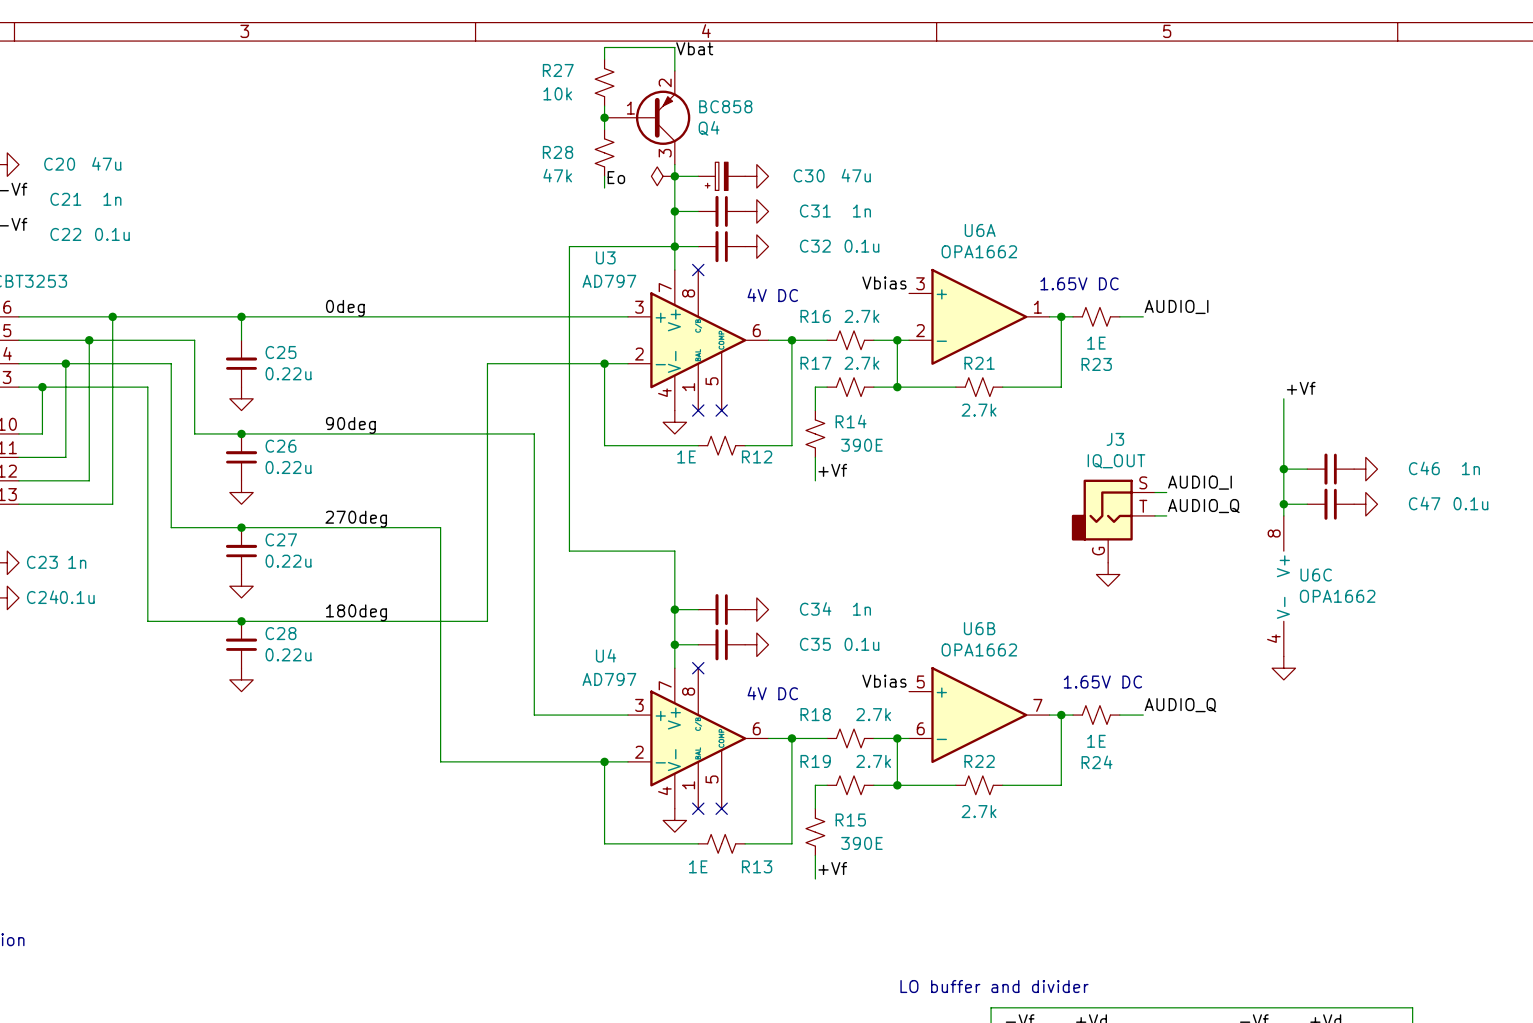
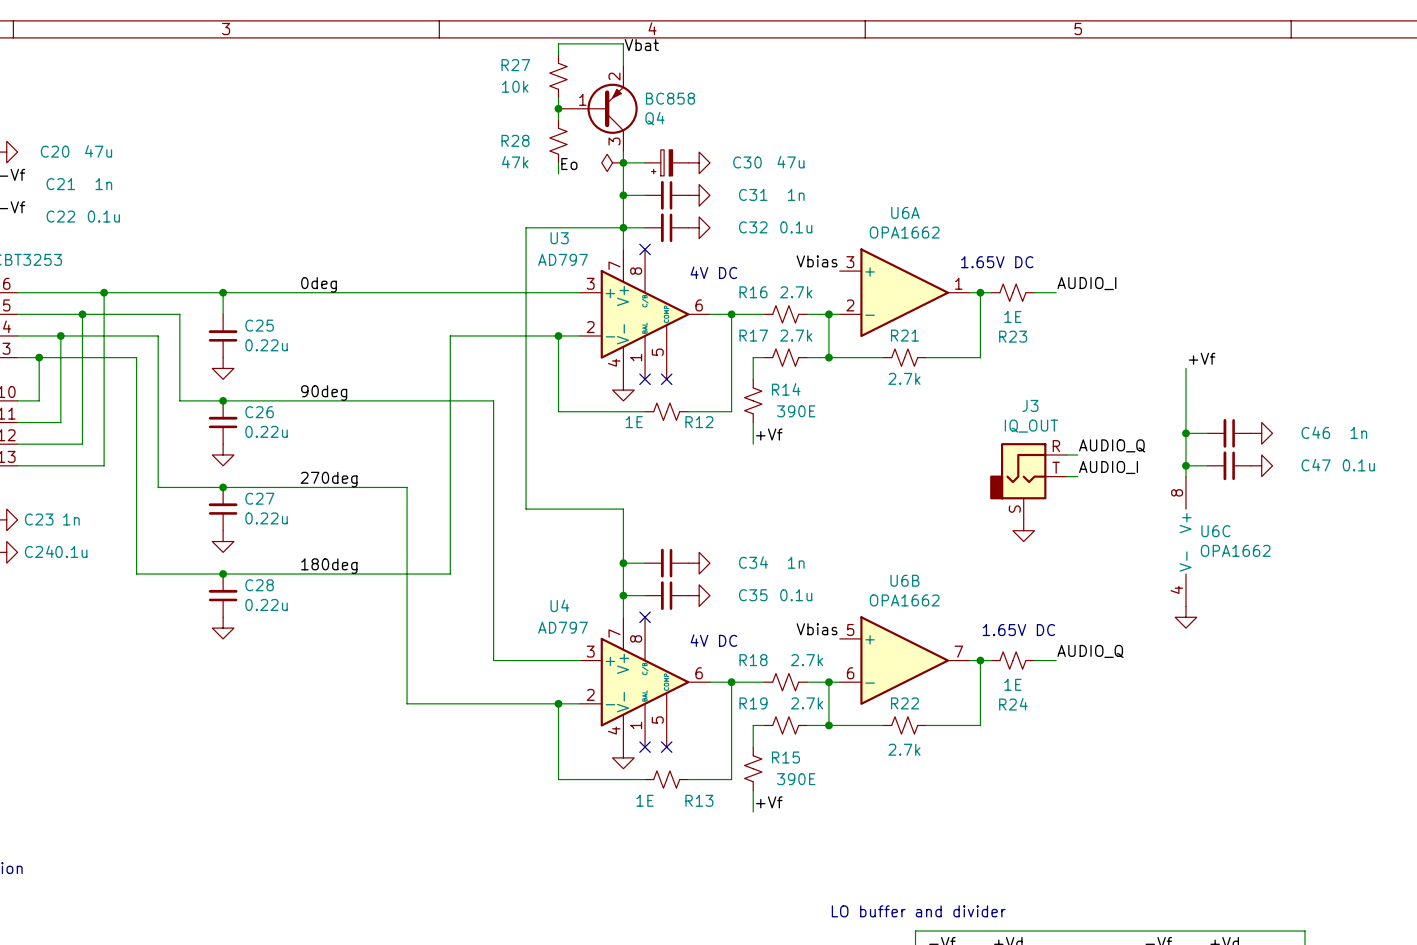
J3 pin number: S (1143, 482) -> R (1056, 446)
label: AUDIO_I (1199, 482) -> AUDIO_Q (1112, 445)
label: AUDIO_Q (1203, 506) -> AUDIO_I (1108, 467)
J3 pin number: G (1098, 551) -> S (1014, 509)

